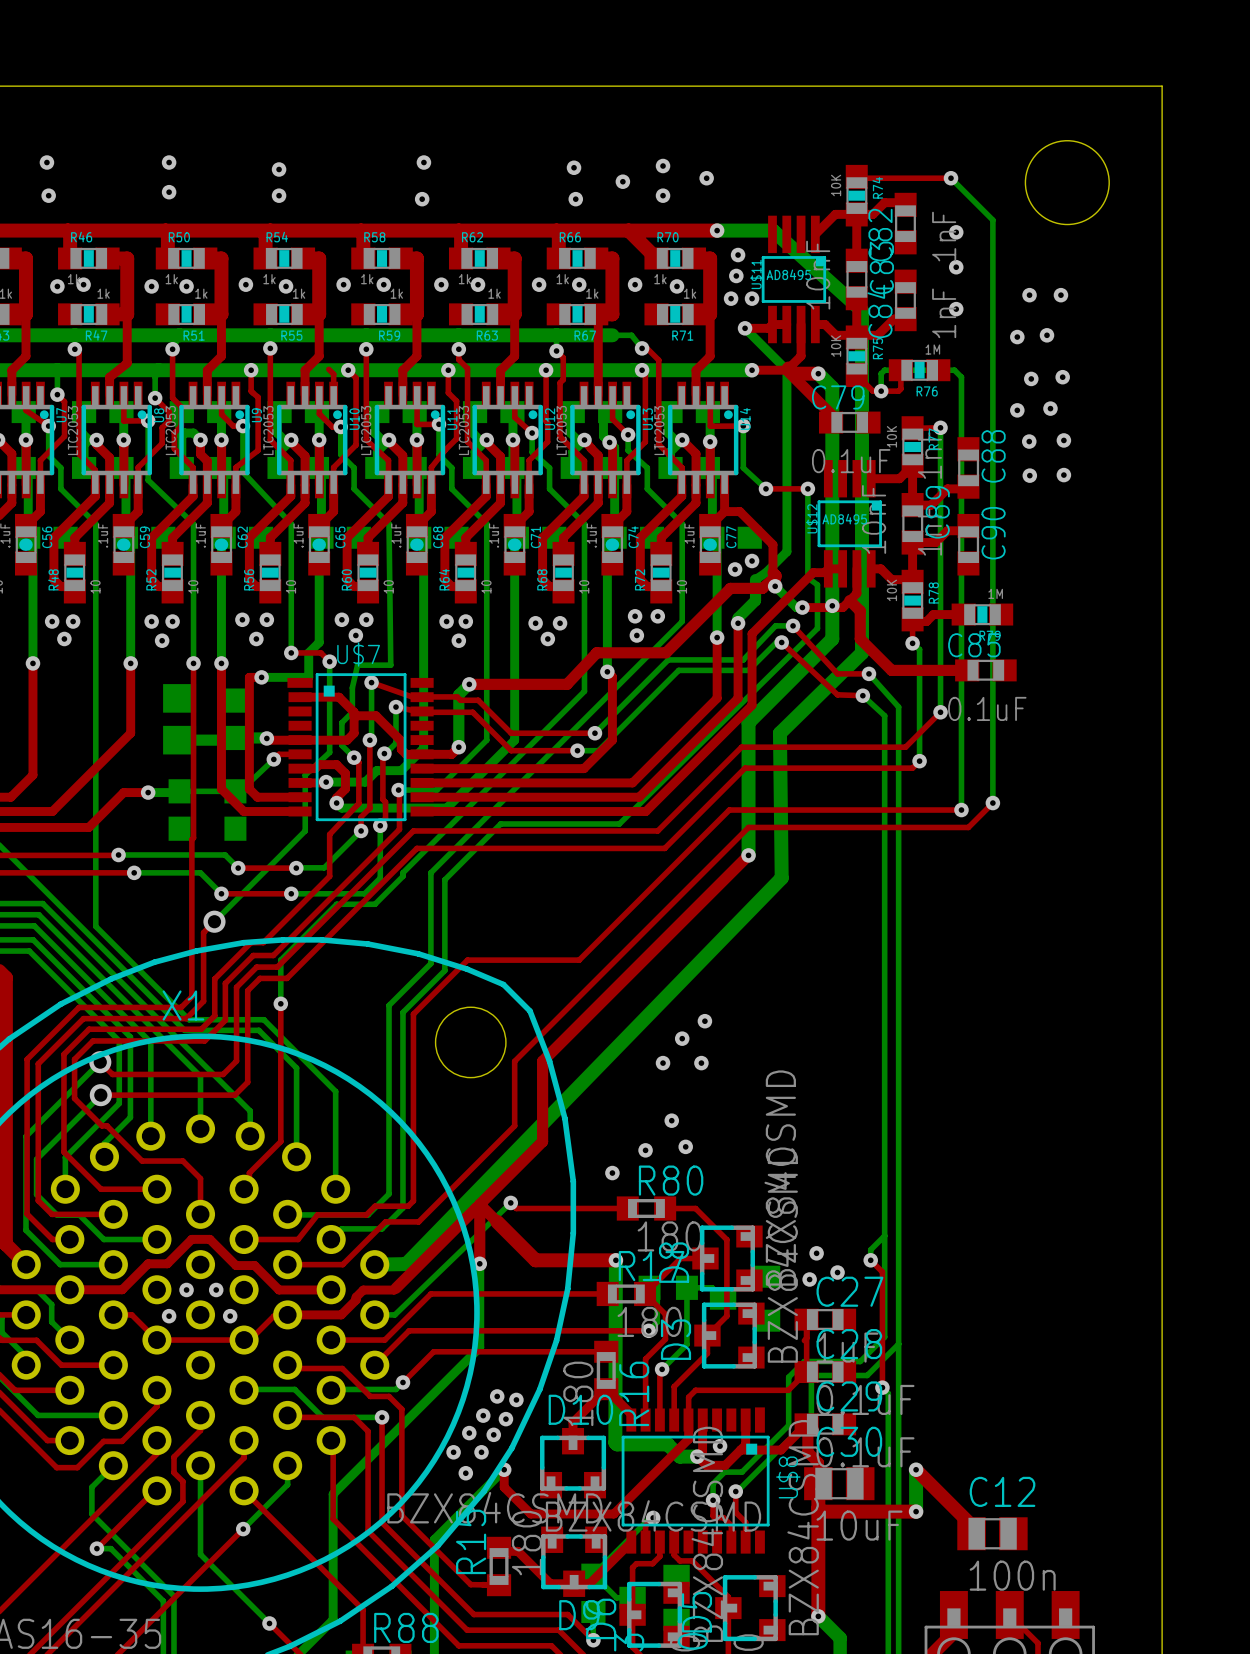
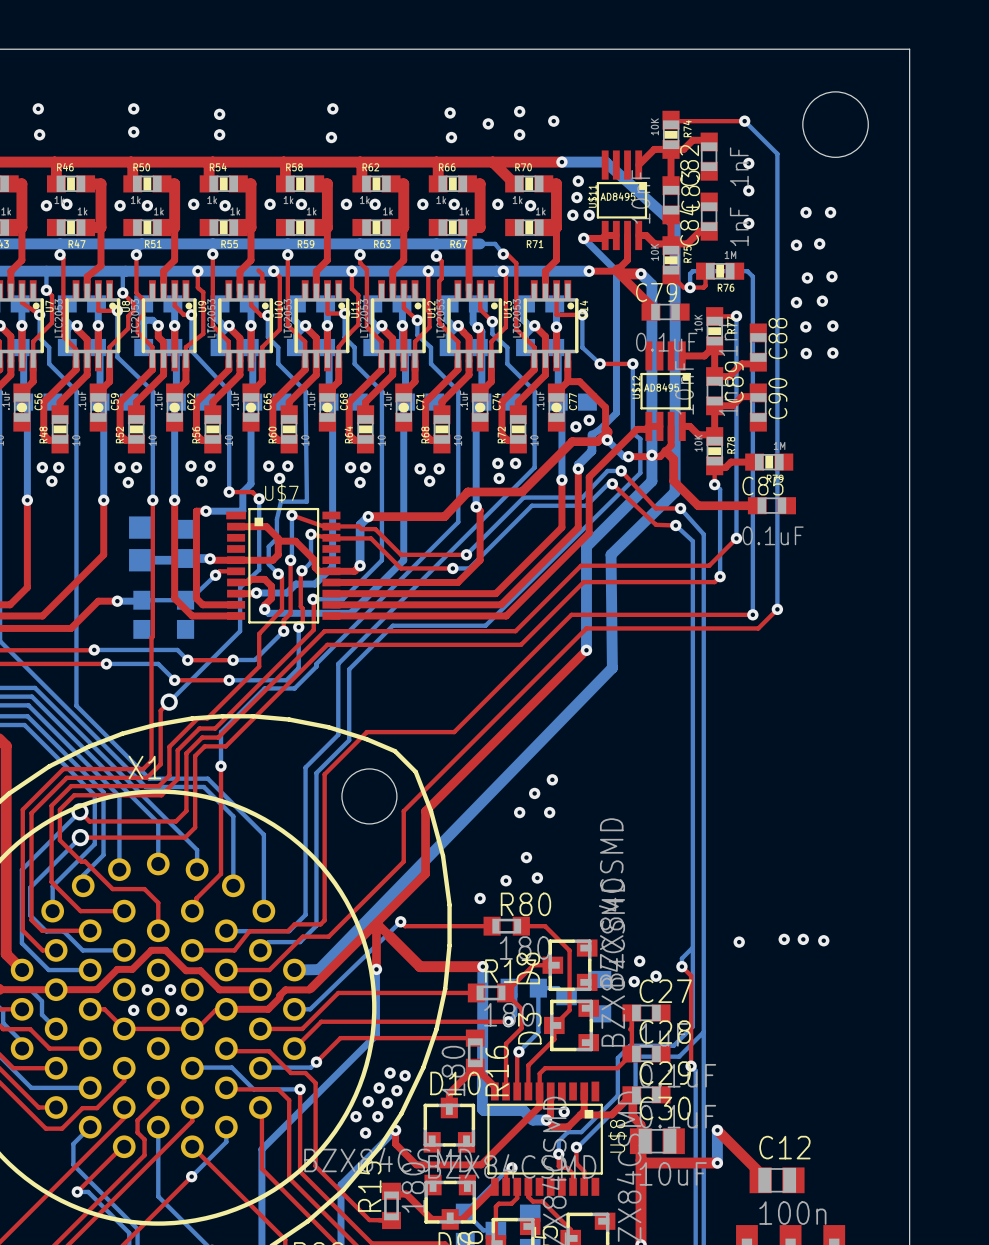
via: none -> (784, 939)
via: none -> (803, 939)
via: none -> (823, 940)
via: none -> (739, 942)

